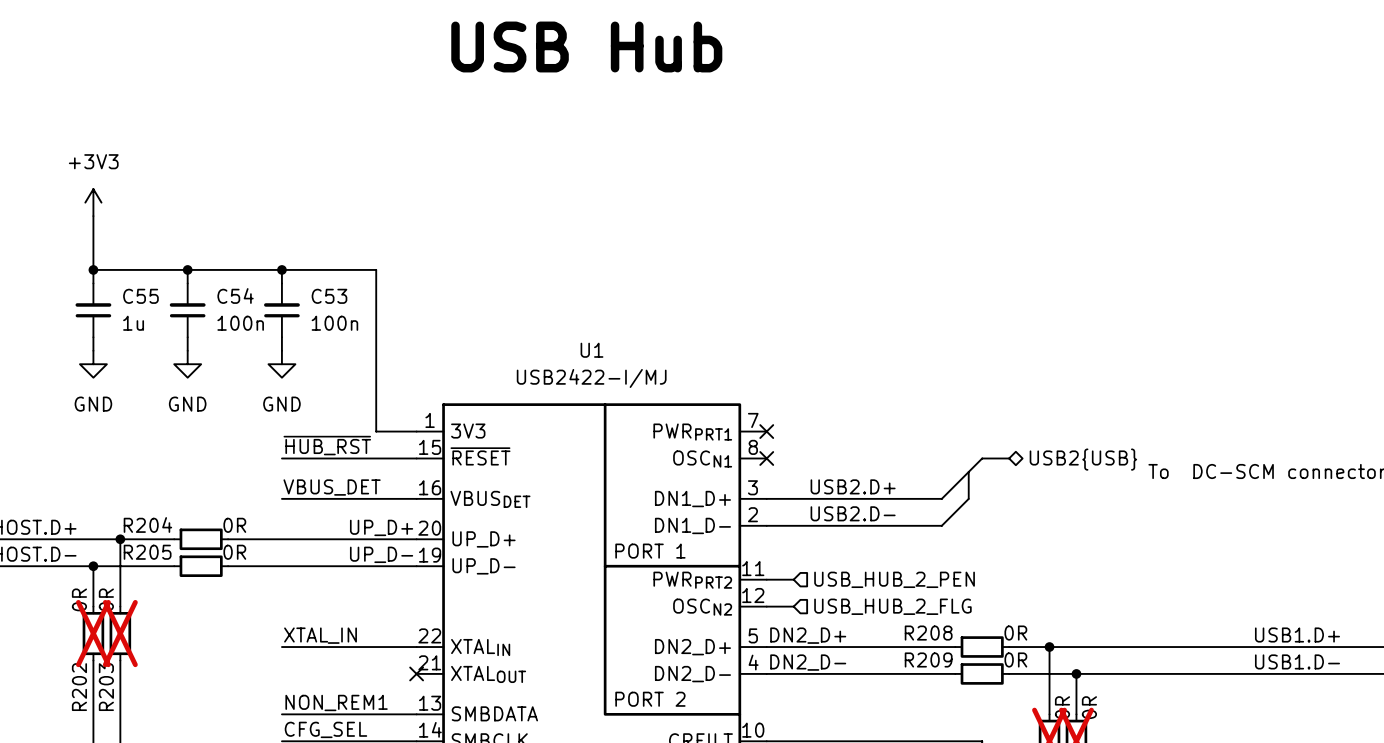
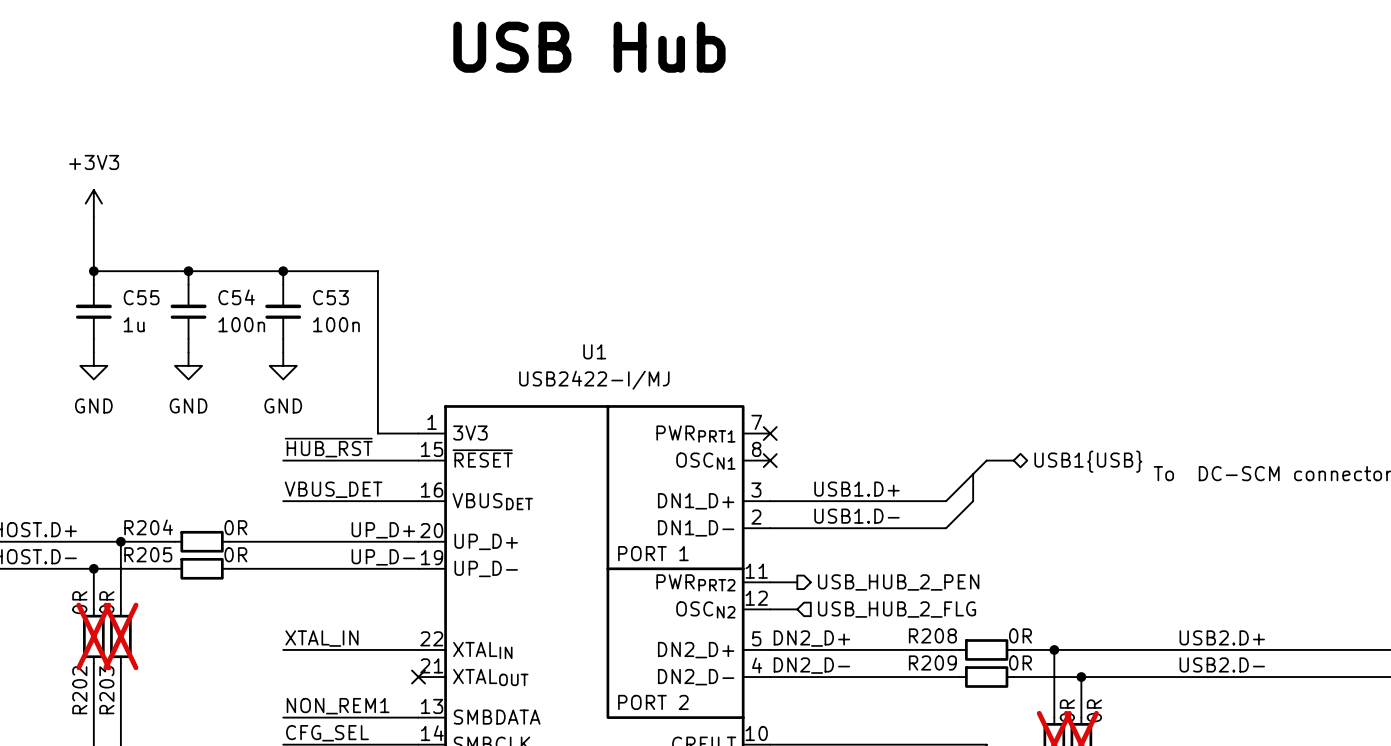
hierarchical label: USB2{USB} (1083, 459) -> USB1{USB} (1088, 461)
label: USB2.D+ (853, 486) -> USB1.D+ (856, 489)
label: USB2.D- (853, 513) -> USB1.D- (856, 516)
hierarchical label shape: input (894, 579) -> output (898, 582)
label: none -> USB2.D+ (1222, 637)
label: USB1.D+ (1297, 635) -> none
label: none -> USB2.D- (1222, 664)
label: USB1.D- (1297, 661) -> none

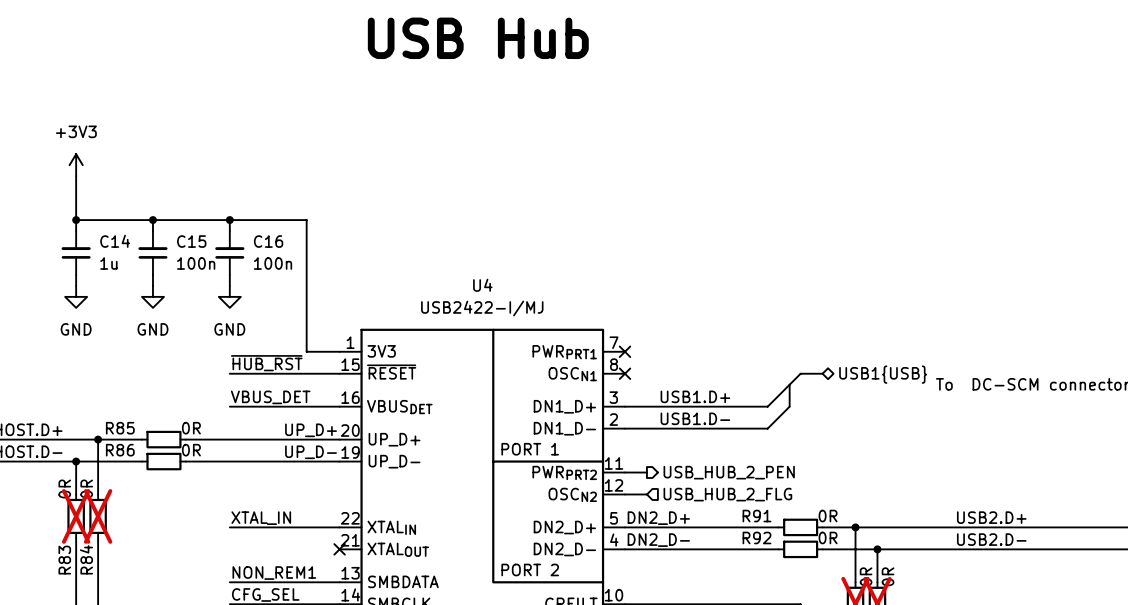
C55 name: C55 (141, 297) -> C14 (115, 241)
C54 name: C54 (236, 297) -> C15 (191, 241)
C53 name: C53 (330, 297) -> C16 (268, 241)
U1 name: U1 (594, 351) -> U4 (482, 285)
R204 name: R204 (148, 527) -> R85 (120, 428)
R205 name: R205 (148, 554) -> R86 (120, 450)
R208 name: R208 (932, 635) -> R91 (756, 516)
R209 name: R209 (932, 662) -> R92 (756, 537)
R202 name: R202 (79, 690) -> R83 (64, 560)
R203 name: R203 (106, 690) -> R84 (86, 559)

